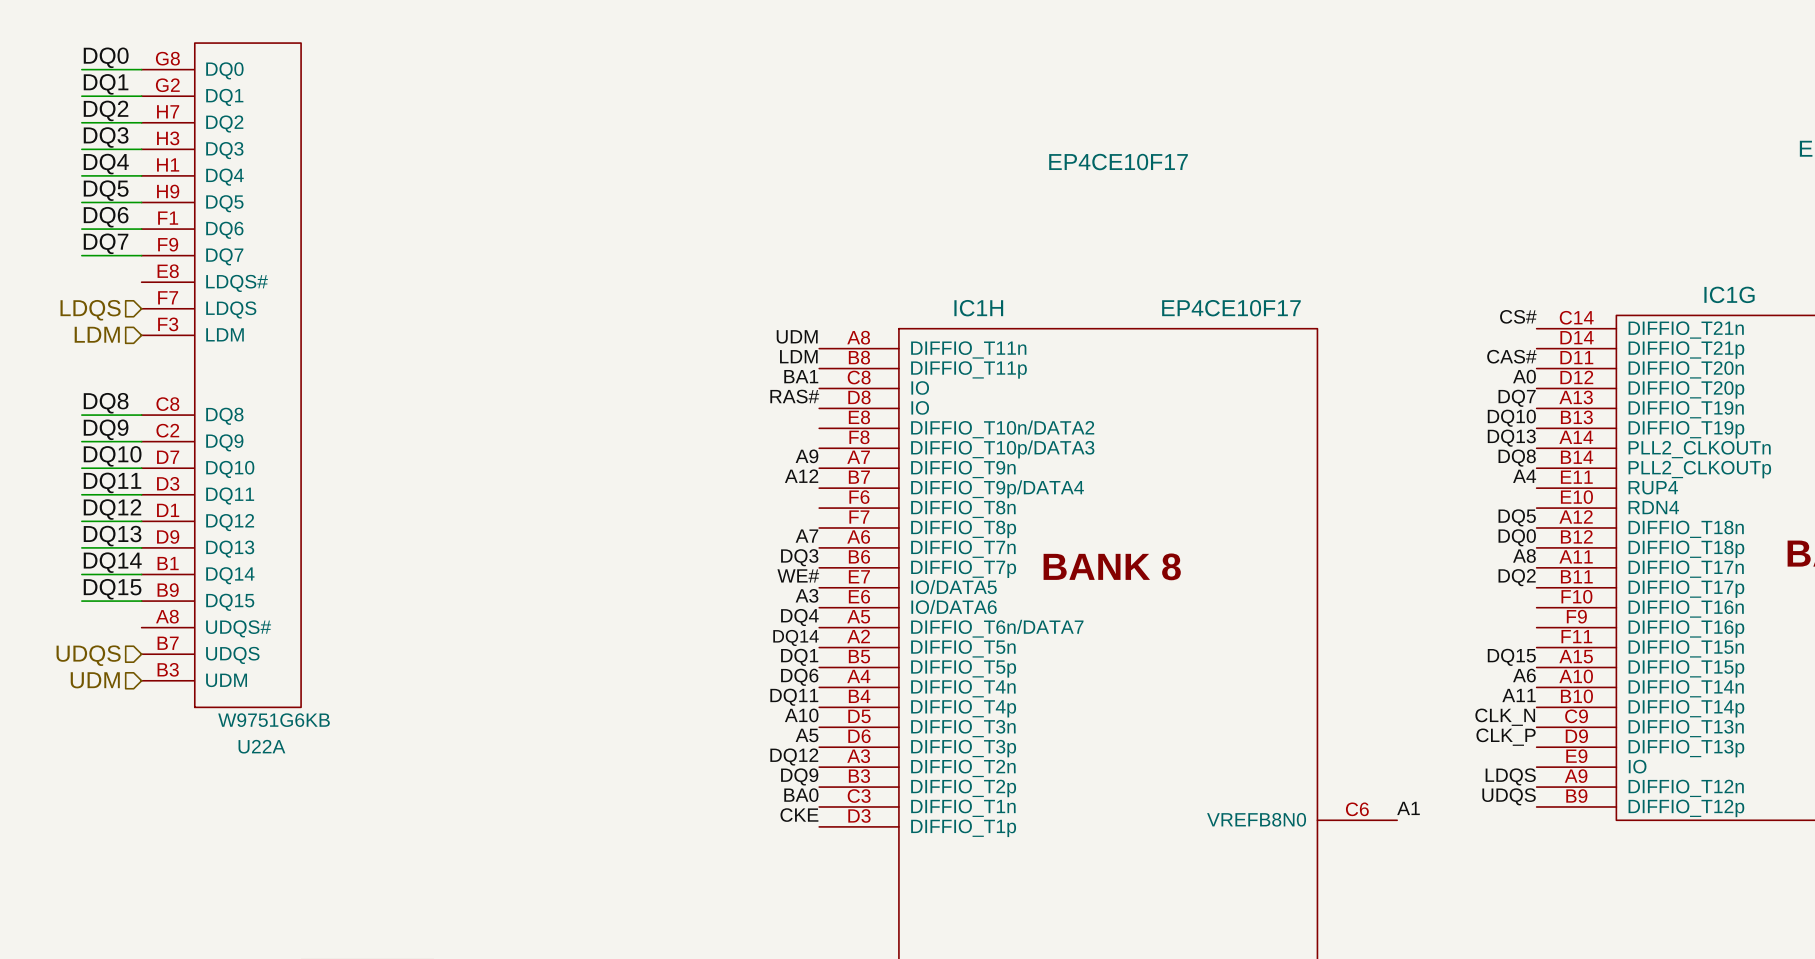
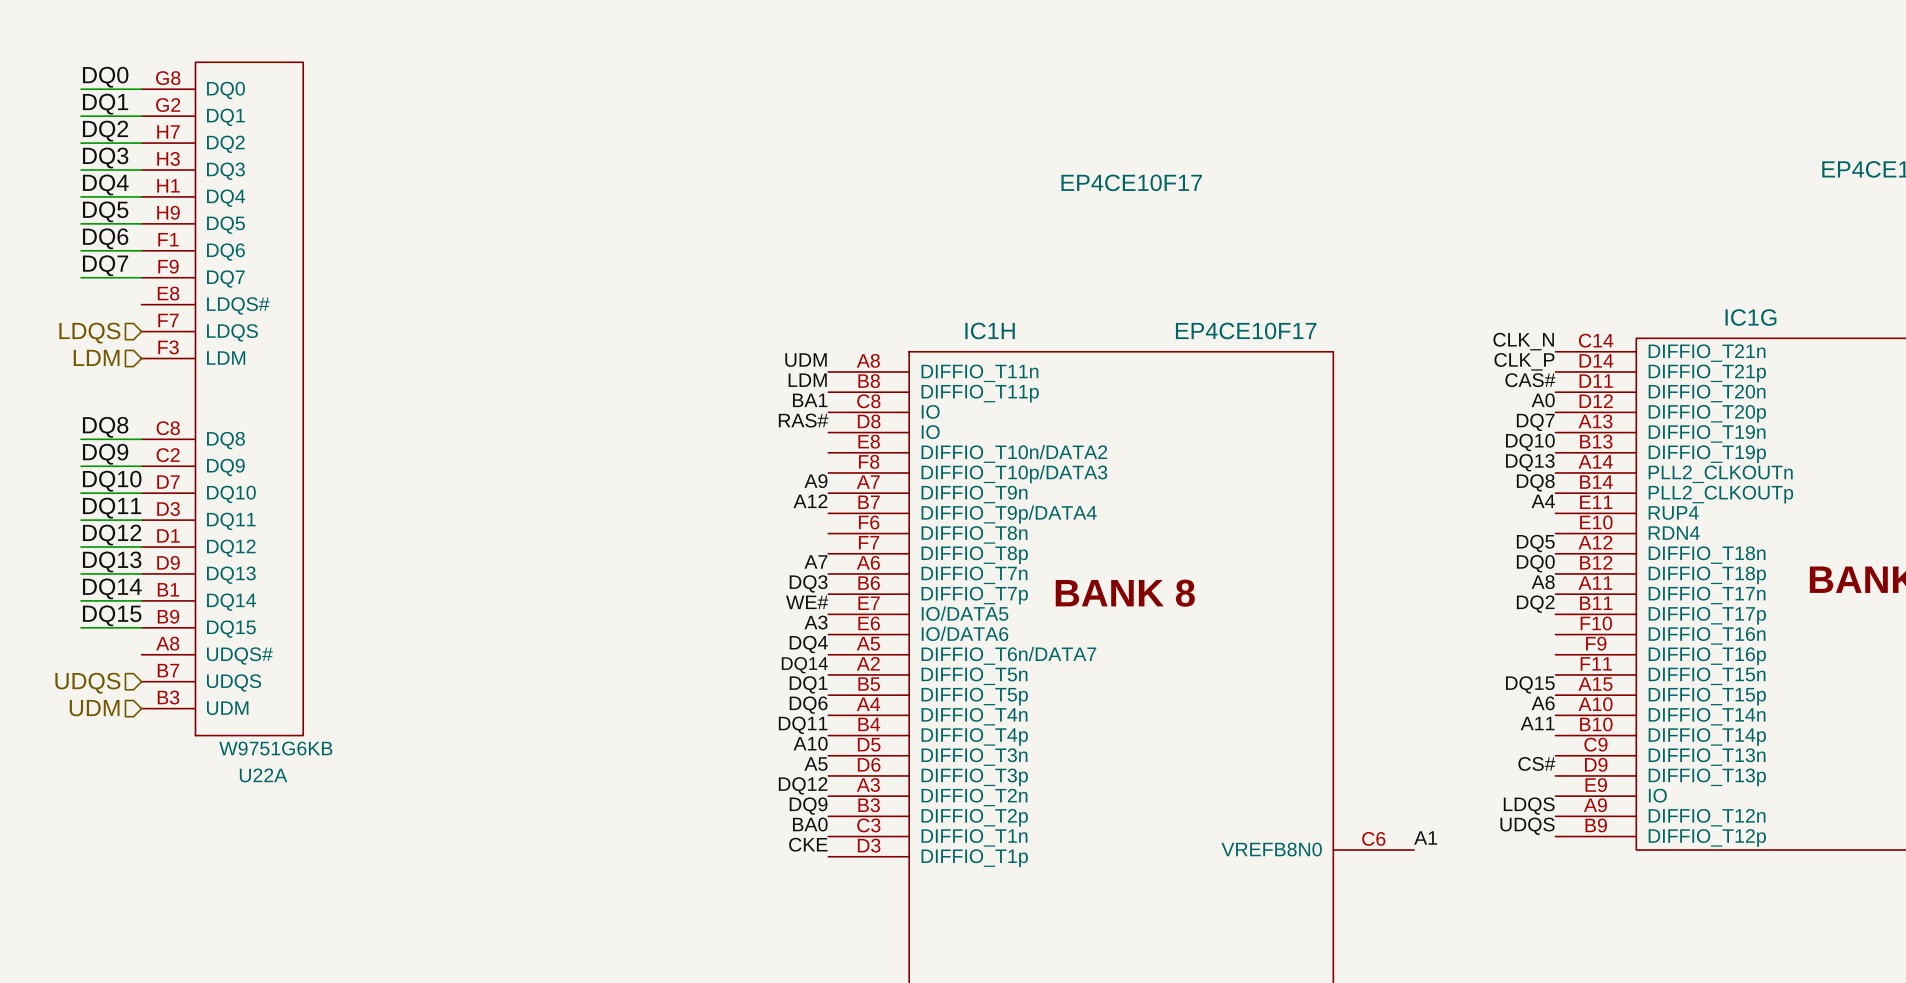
label: CS# (1518, 316) -> CLK_N (1523, 341)
label: none -> CLK_P (1524, 361)
label: CLK_N (1505, 717) -> none
label: CLK_P (1506, 737) -> CS# (1536, 763)

